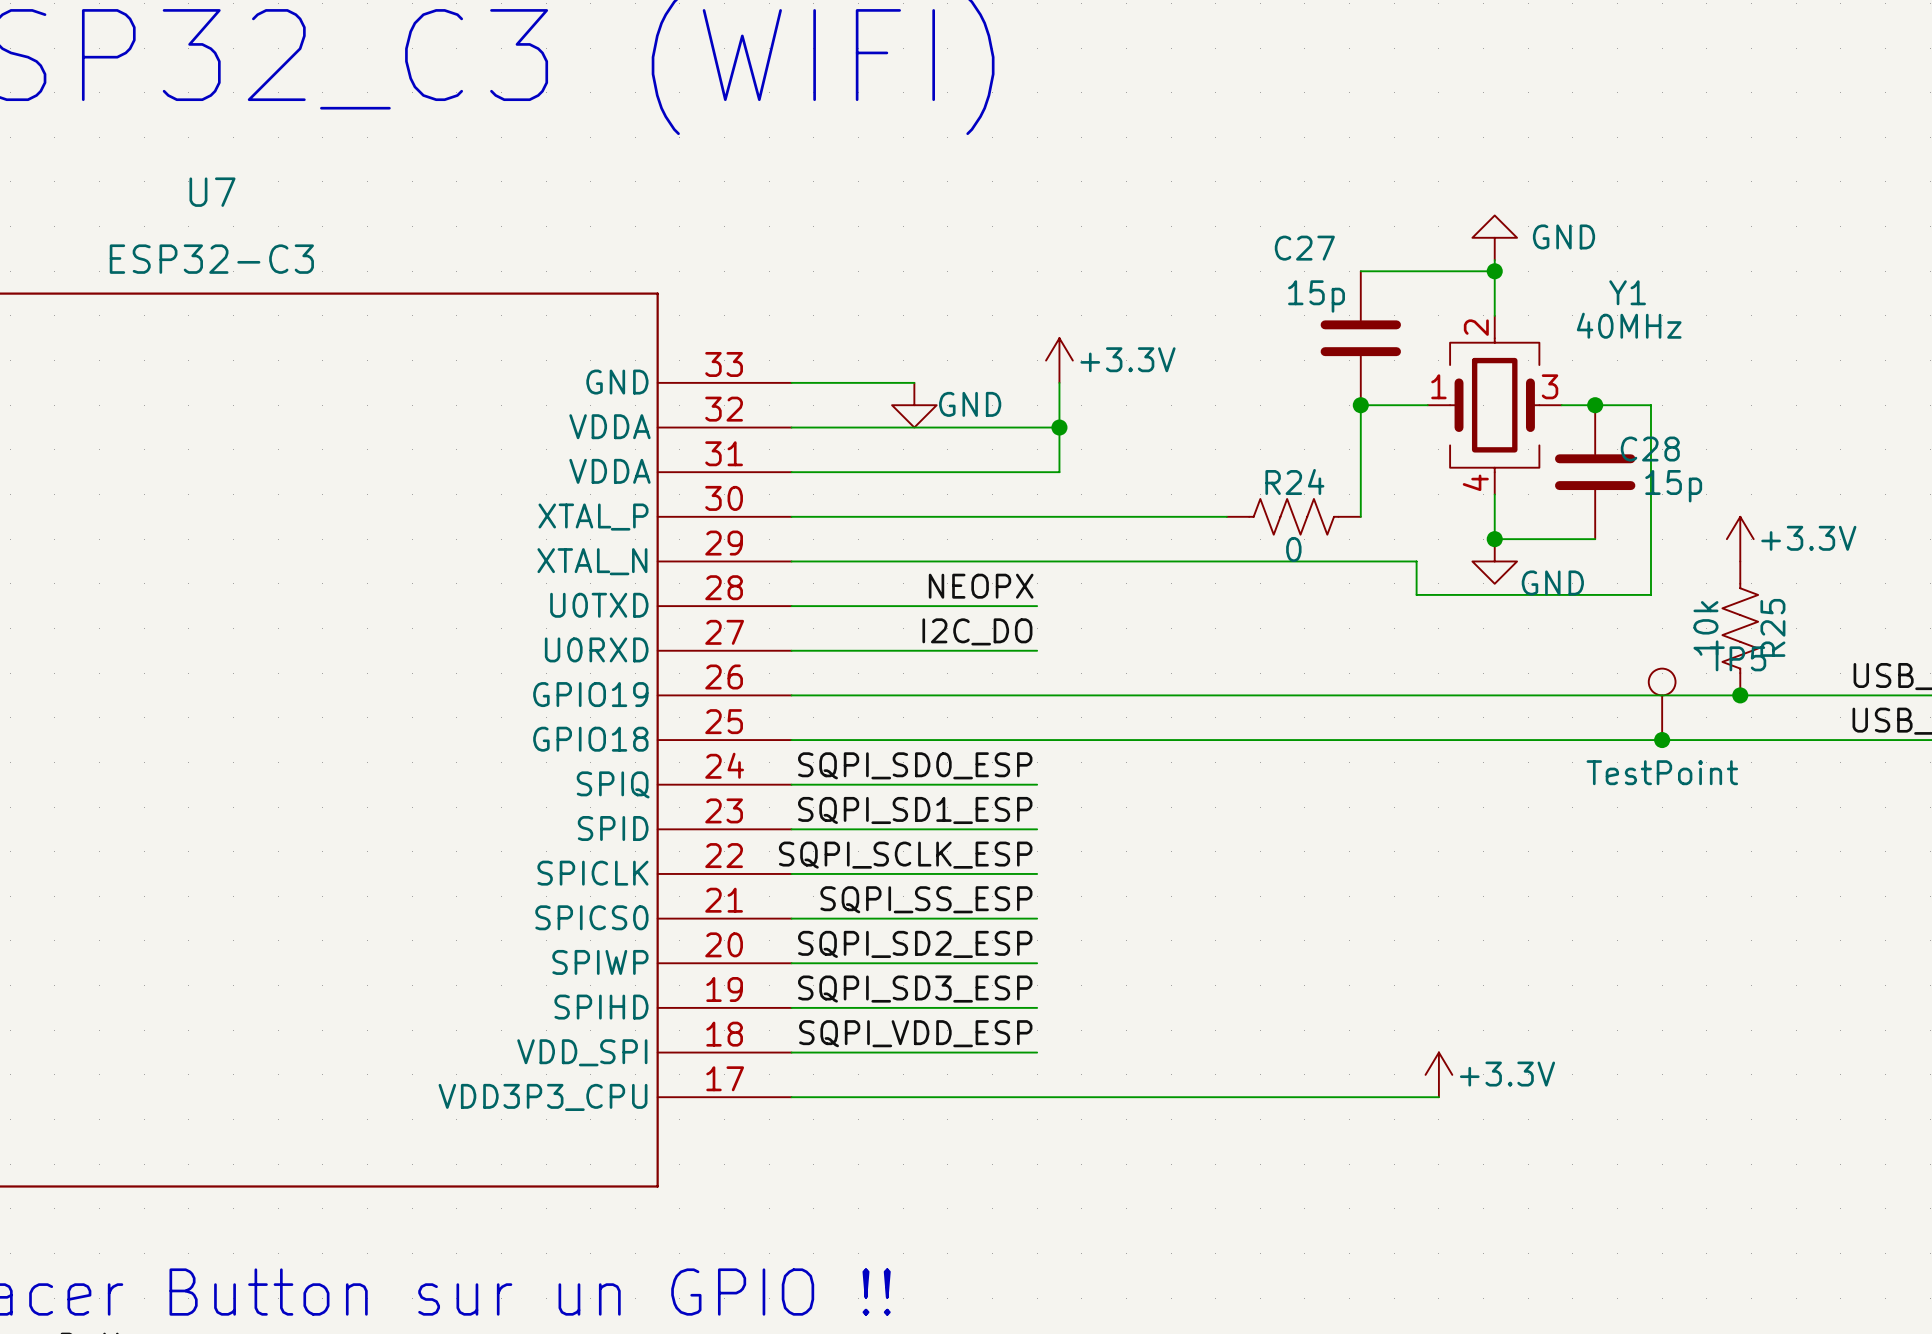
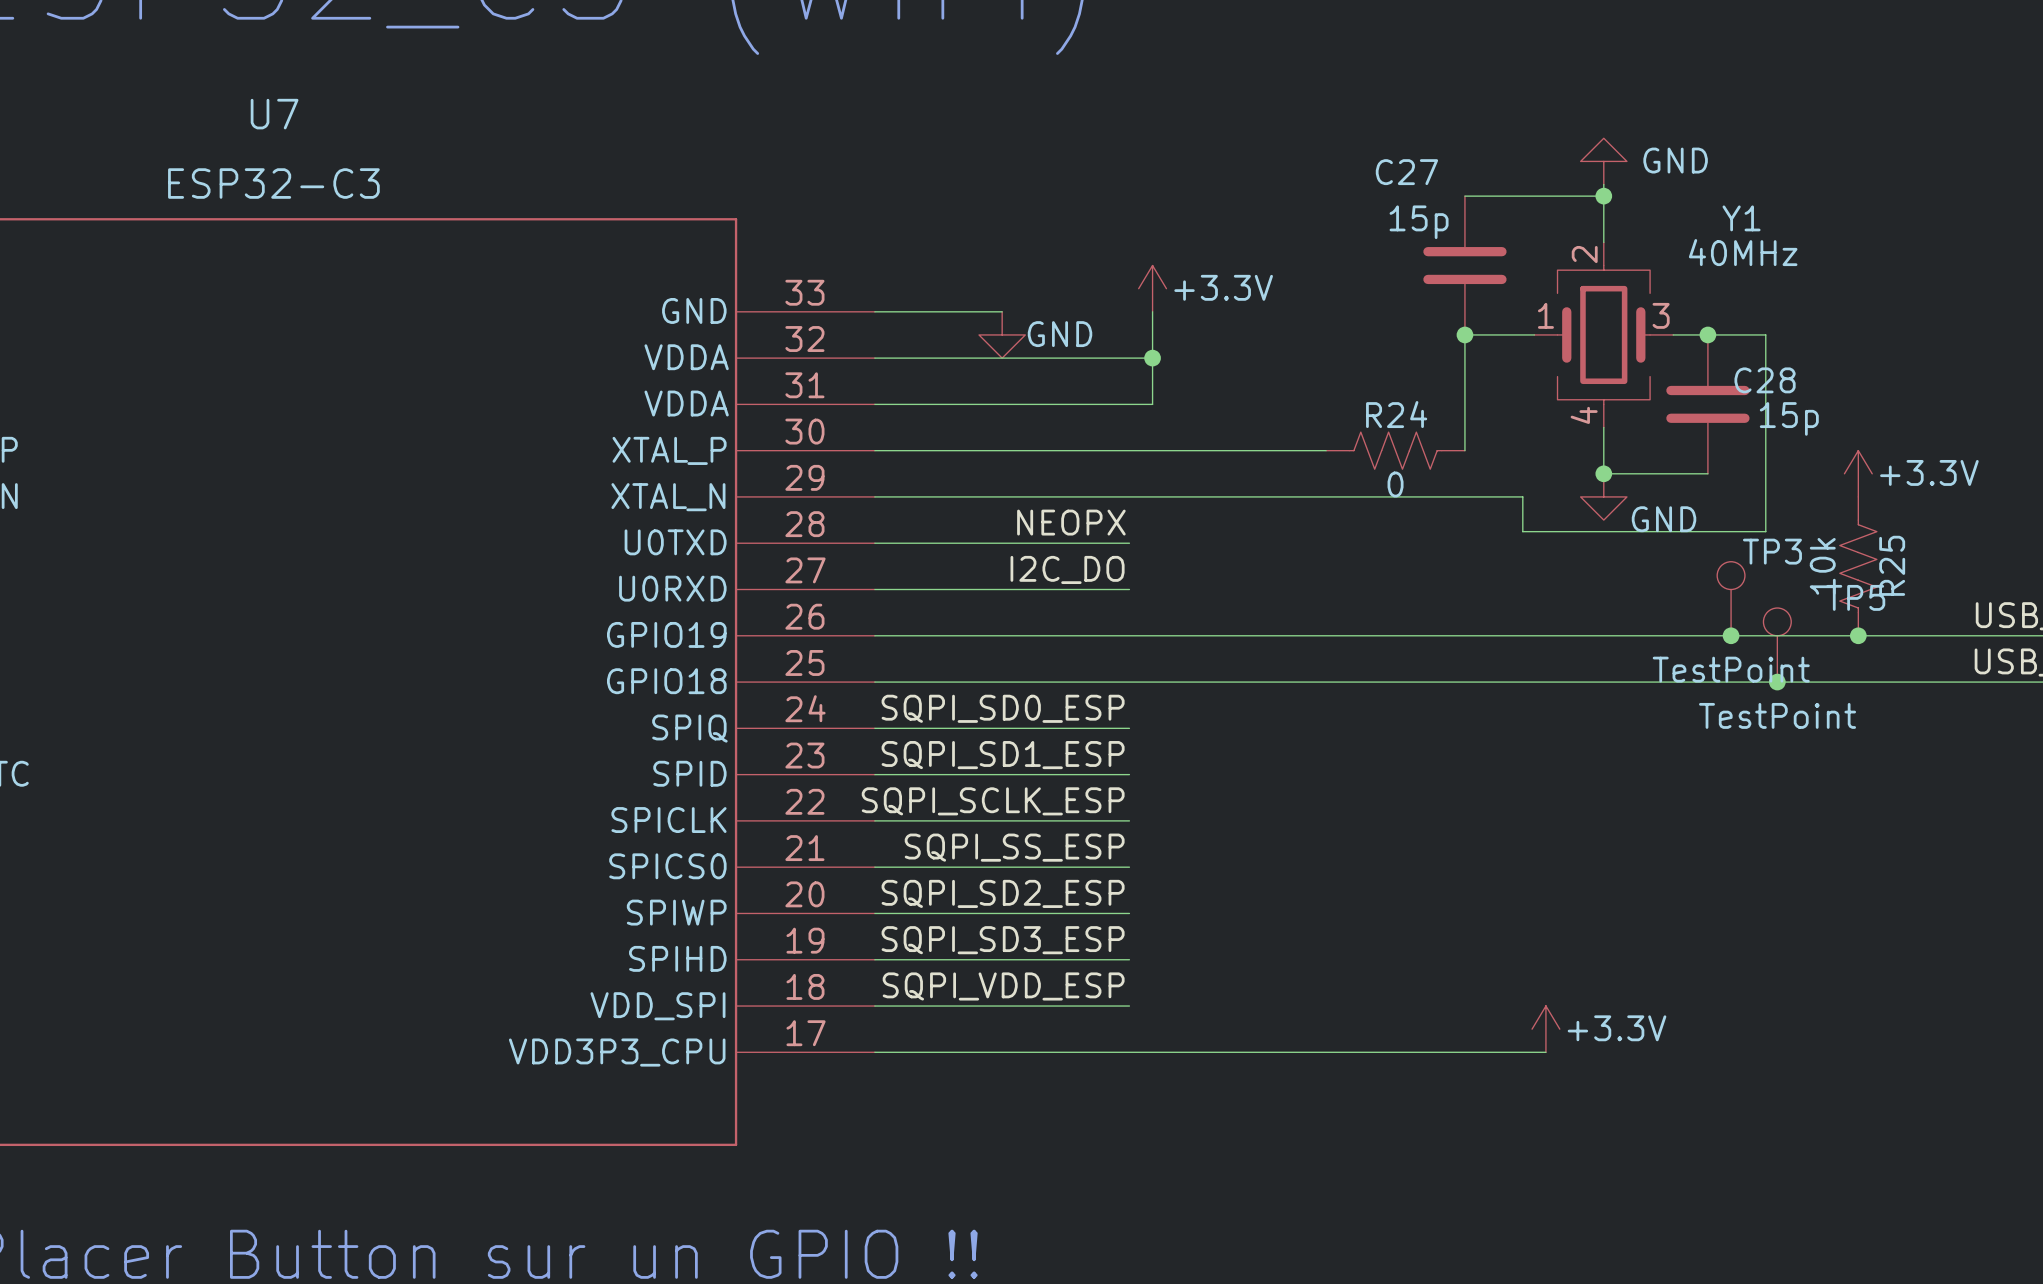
TP3: none -> TestPoint (1731, 598)
junction: none -> (1731, 635)

